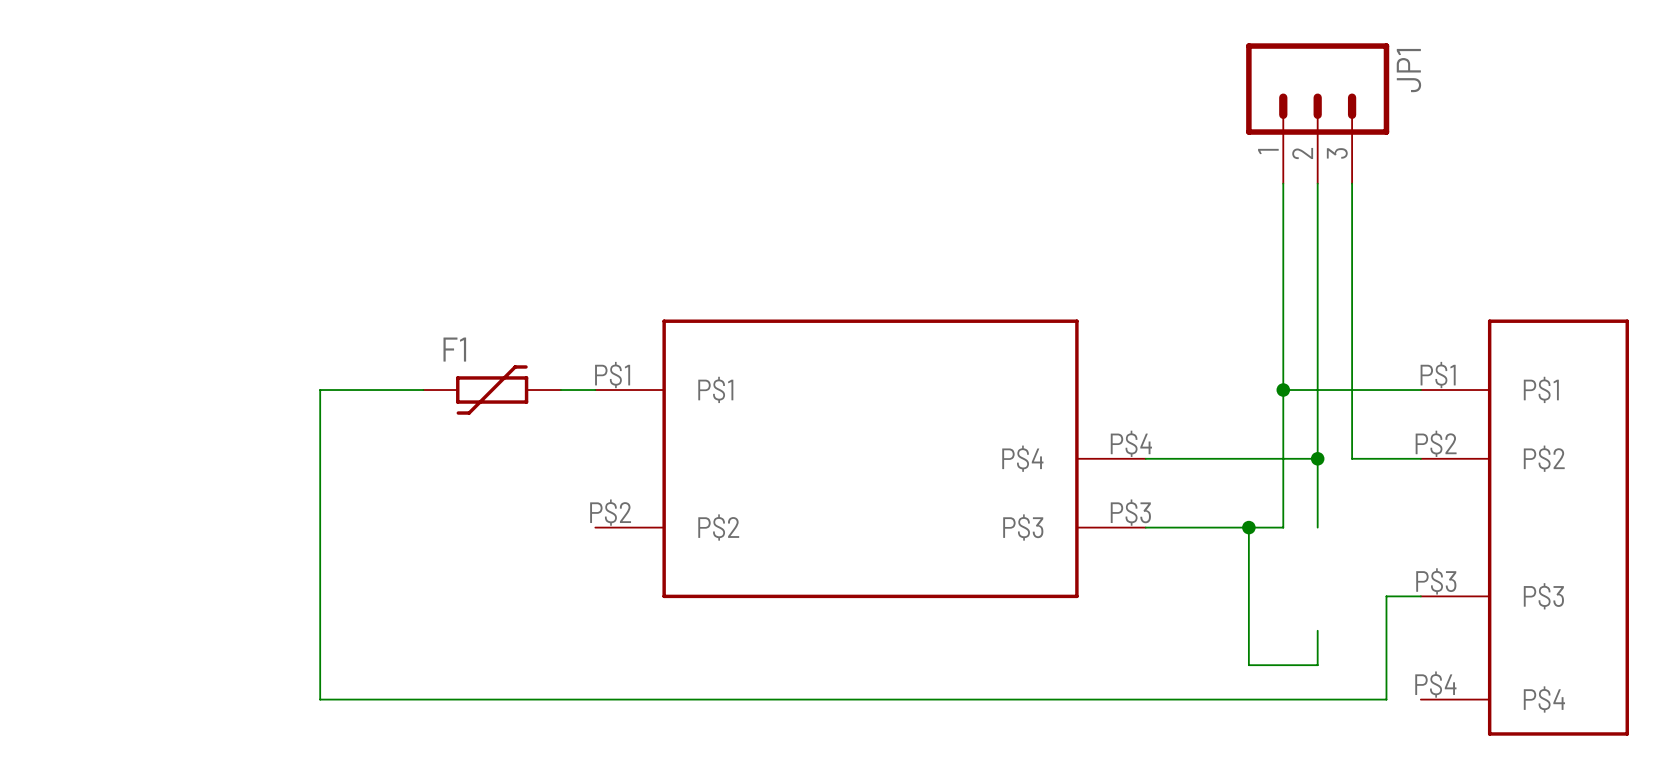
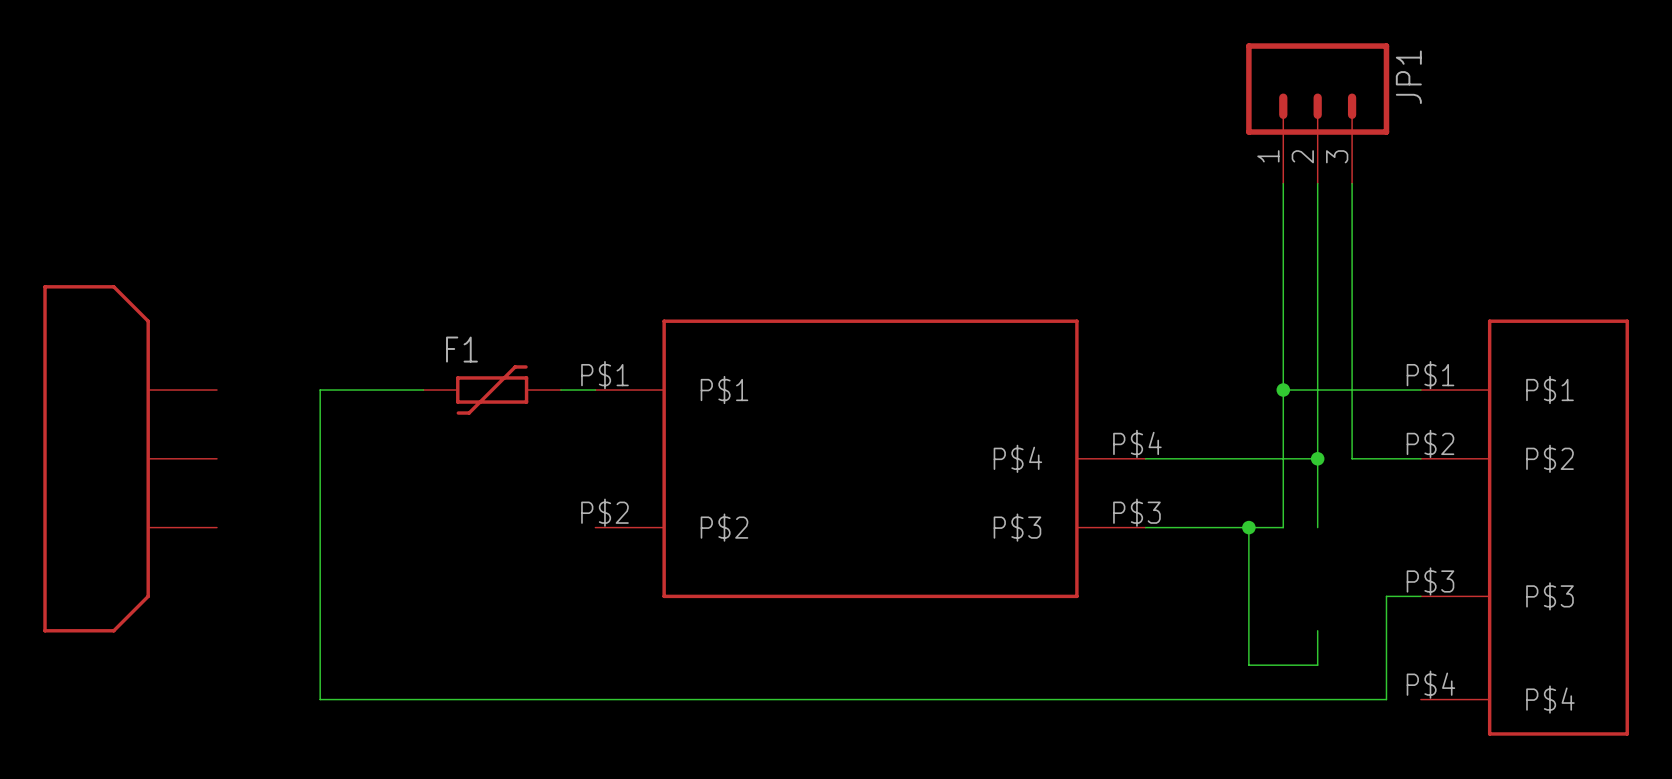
part: none -> (130, 458)

